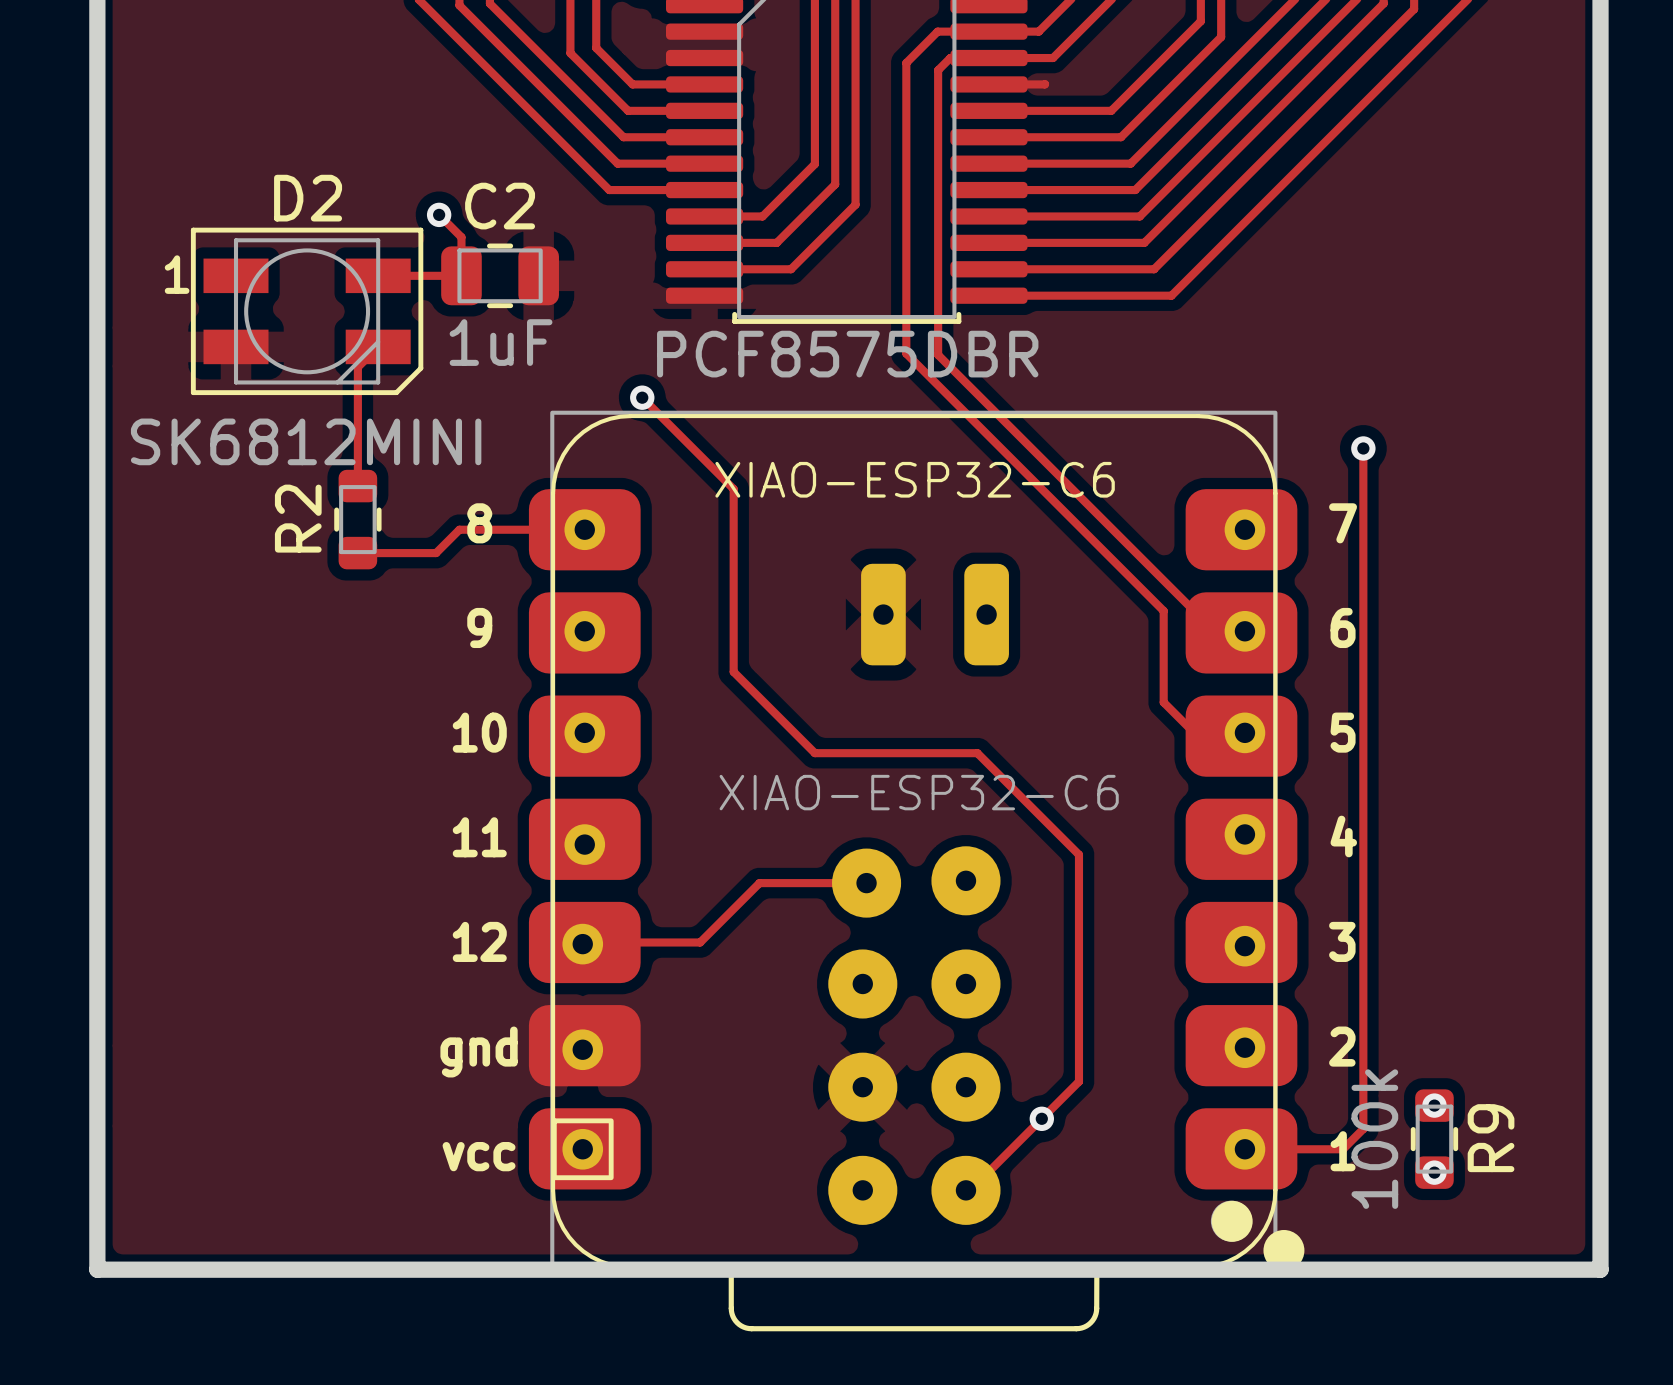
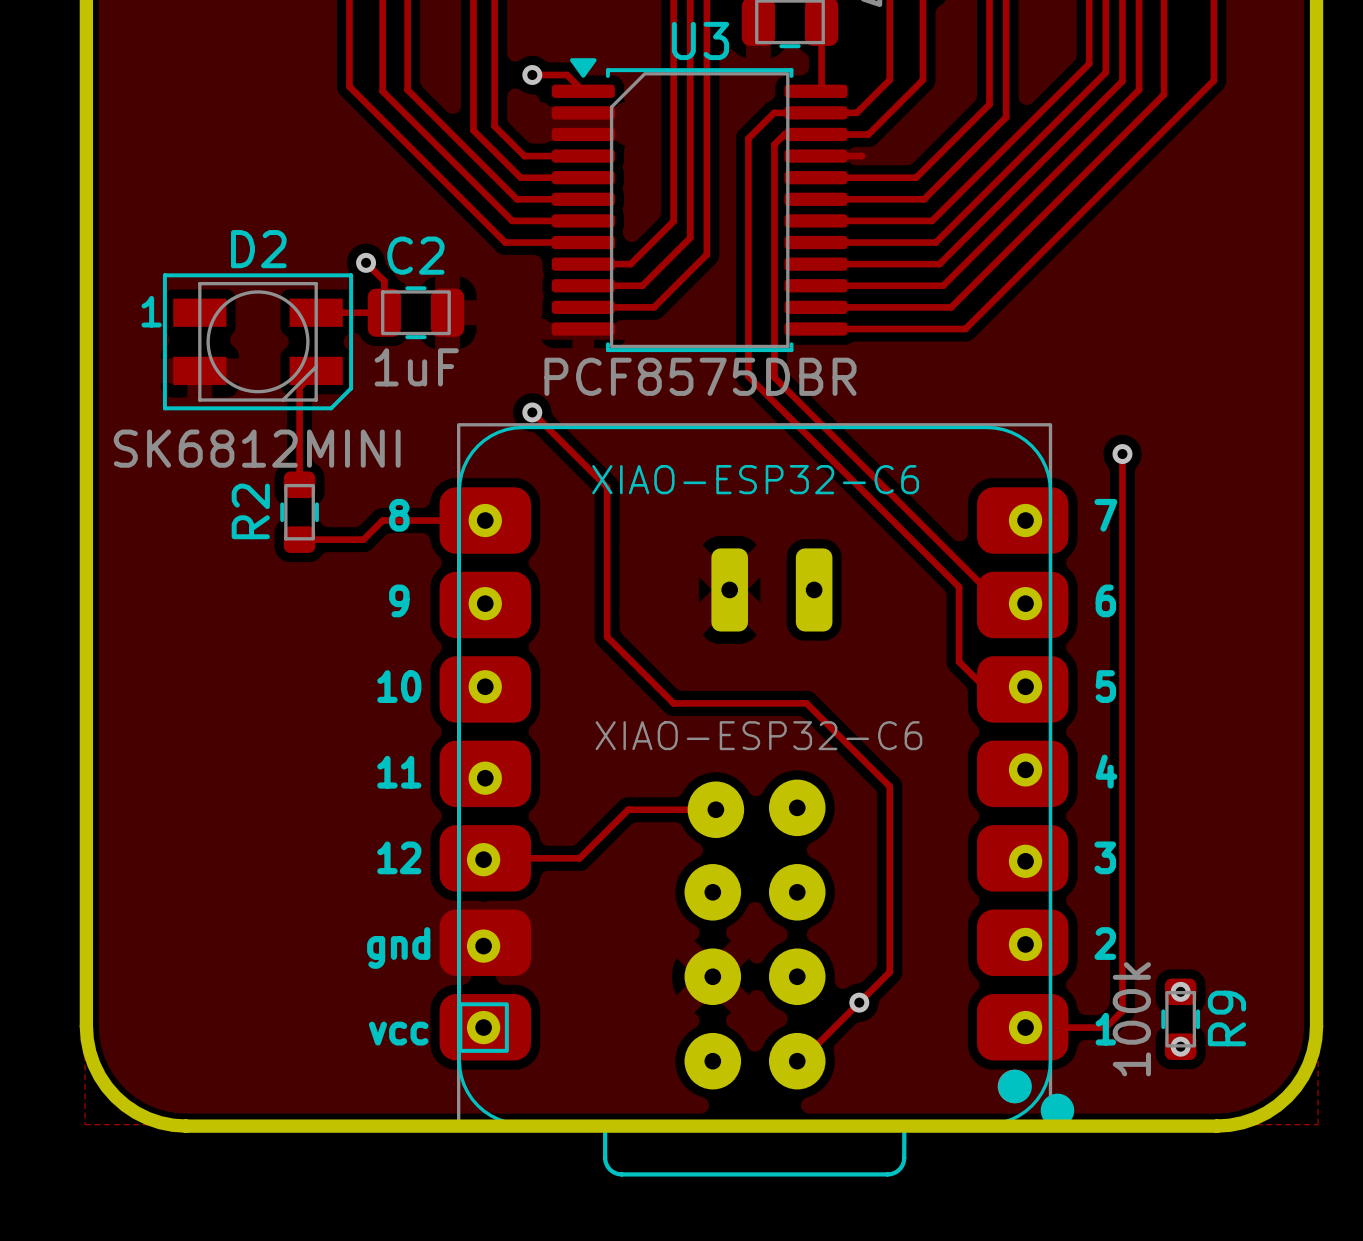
board edge: (97, 1147) (97, 1269) (219, 1269) -> (86, 1026) (89, 1052) (93, 1064) (106, 1087) (115, 1096) (125, 1105) (147, 1118) (173, 1125) (186, 1126)
board edge: (1600, 1147) (1600, 1269) (1478, 1269) -> (1316, 1026) (1313, 1052) (1308, 1064) (1295, 1087) (1287, 1096) (1277, 1105) (1254, 1118) (1242, 1122) (1216, 1126)

